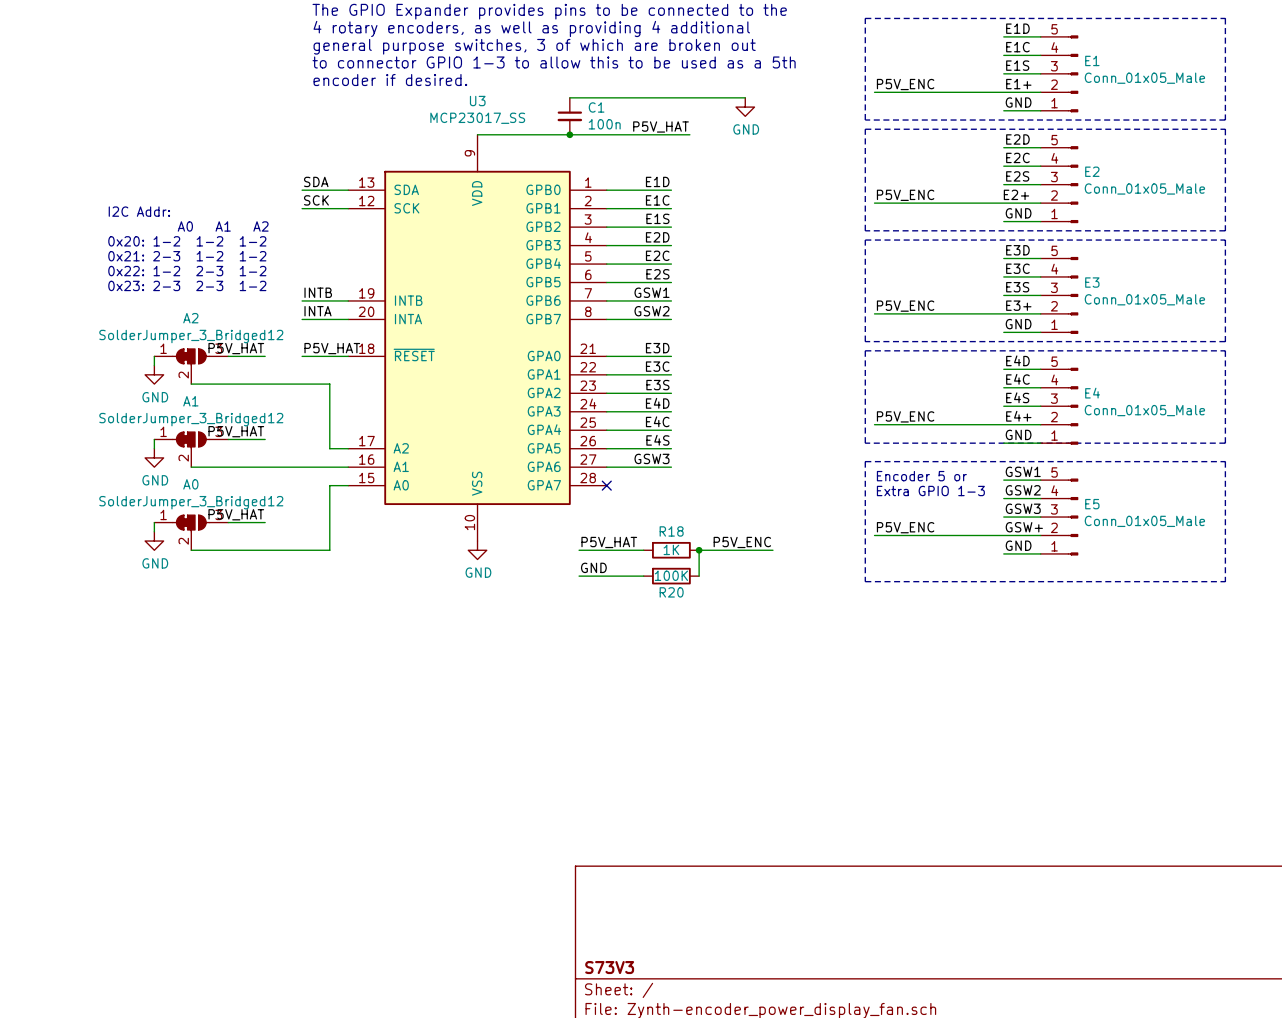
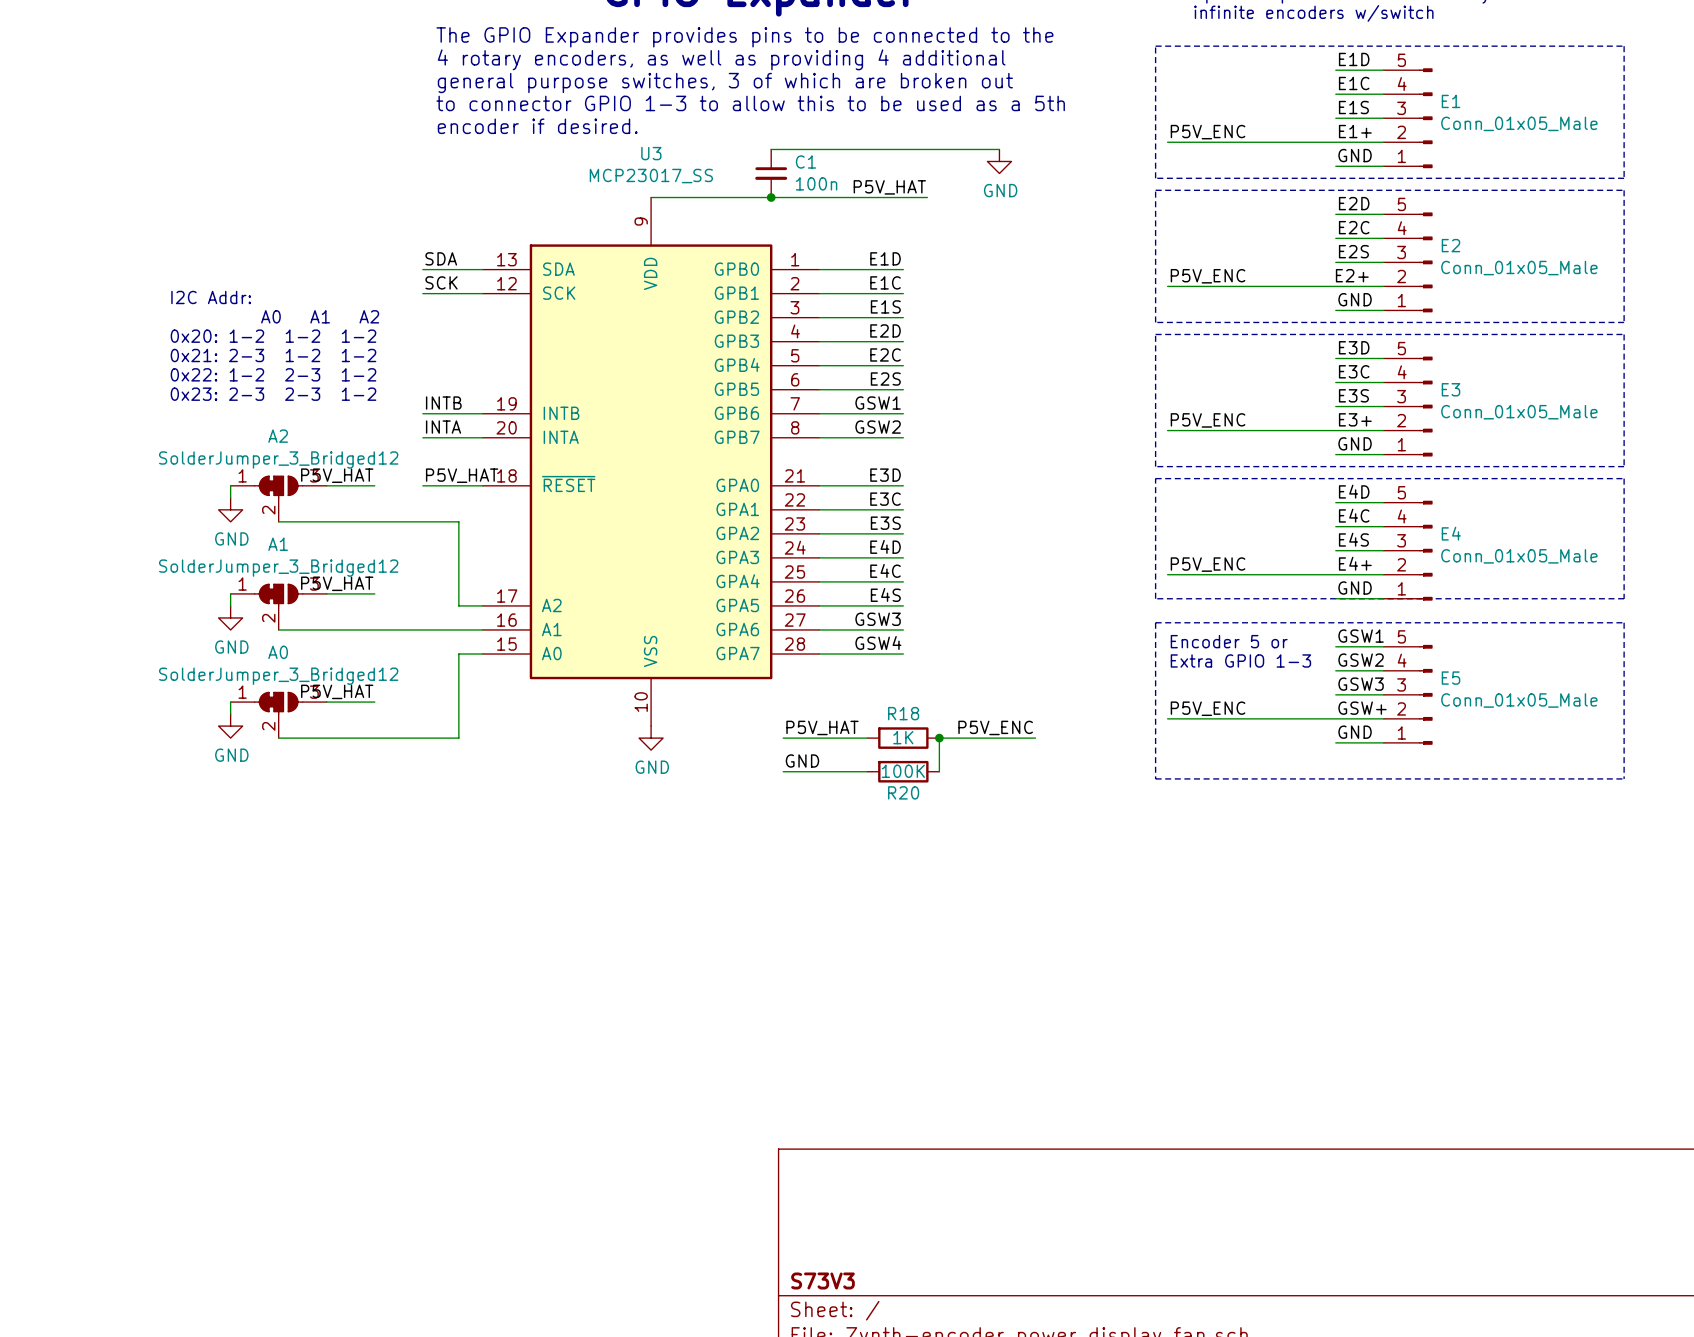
label: none -> GSW4 (878, 643)
wire: none -> (819, 654) (903, 654)
no-connect mark: (606, 485) -> none

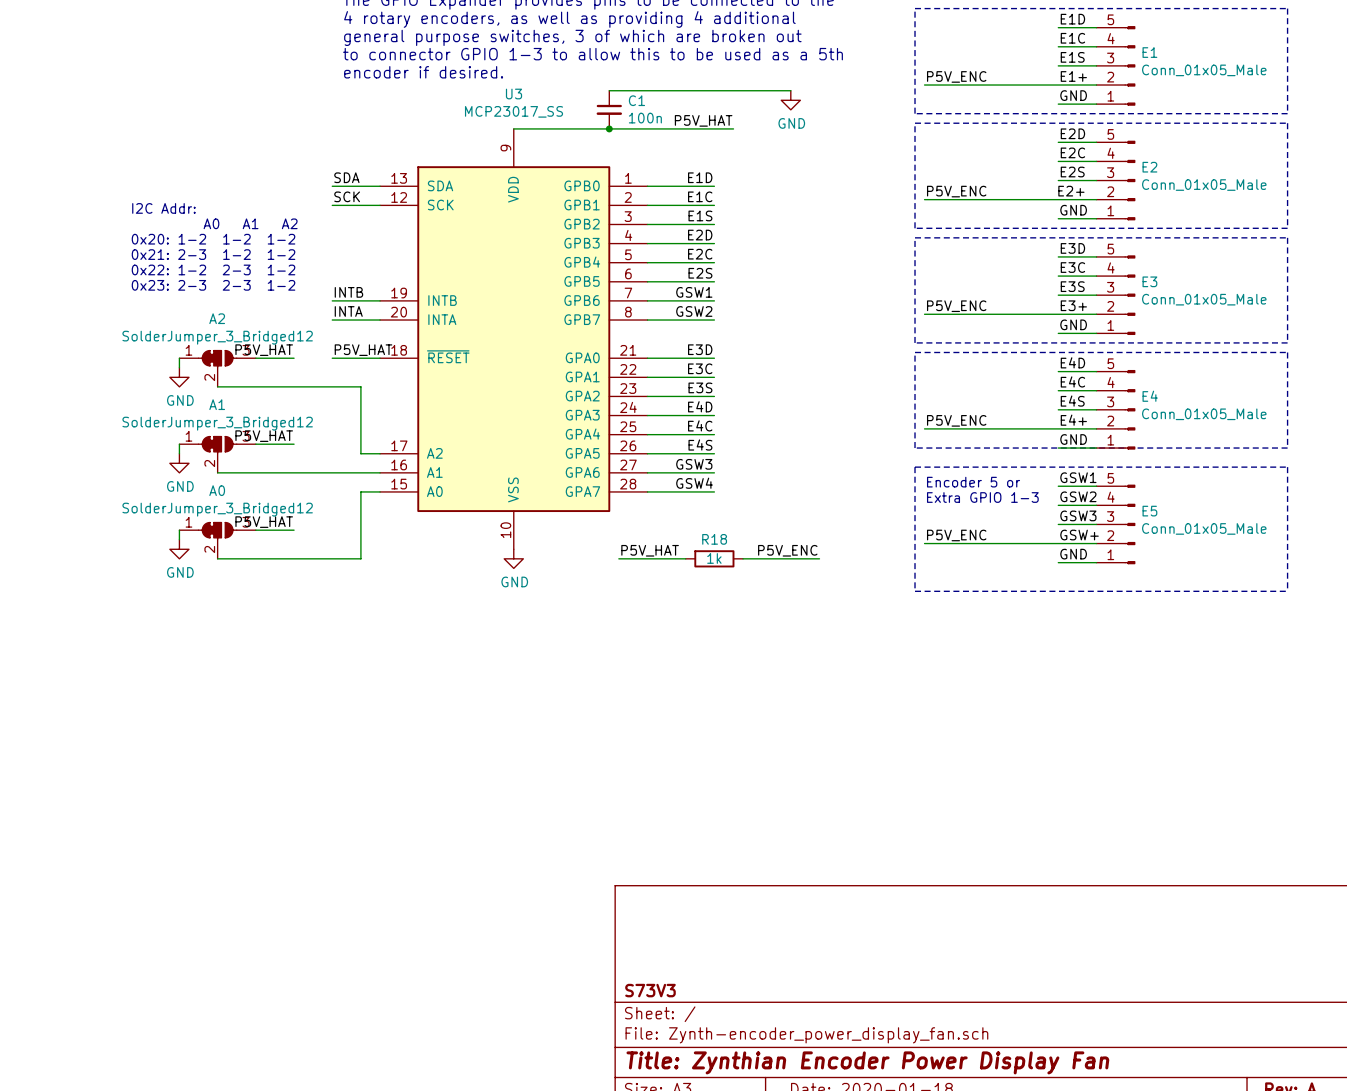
R18 value: 1K (903, 737) -> 1k (714, 558)
wire: (939, 738) (939, 771) -> none
junction: (939, 738) -> none
label: GND (802, 761) -> none
wire: (783, 771) (867, 771) -> none
R20: 100K (903, 771) -> none

